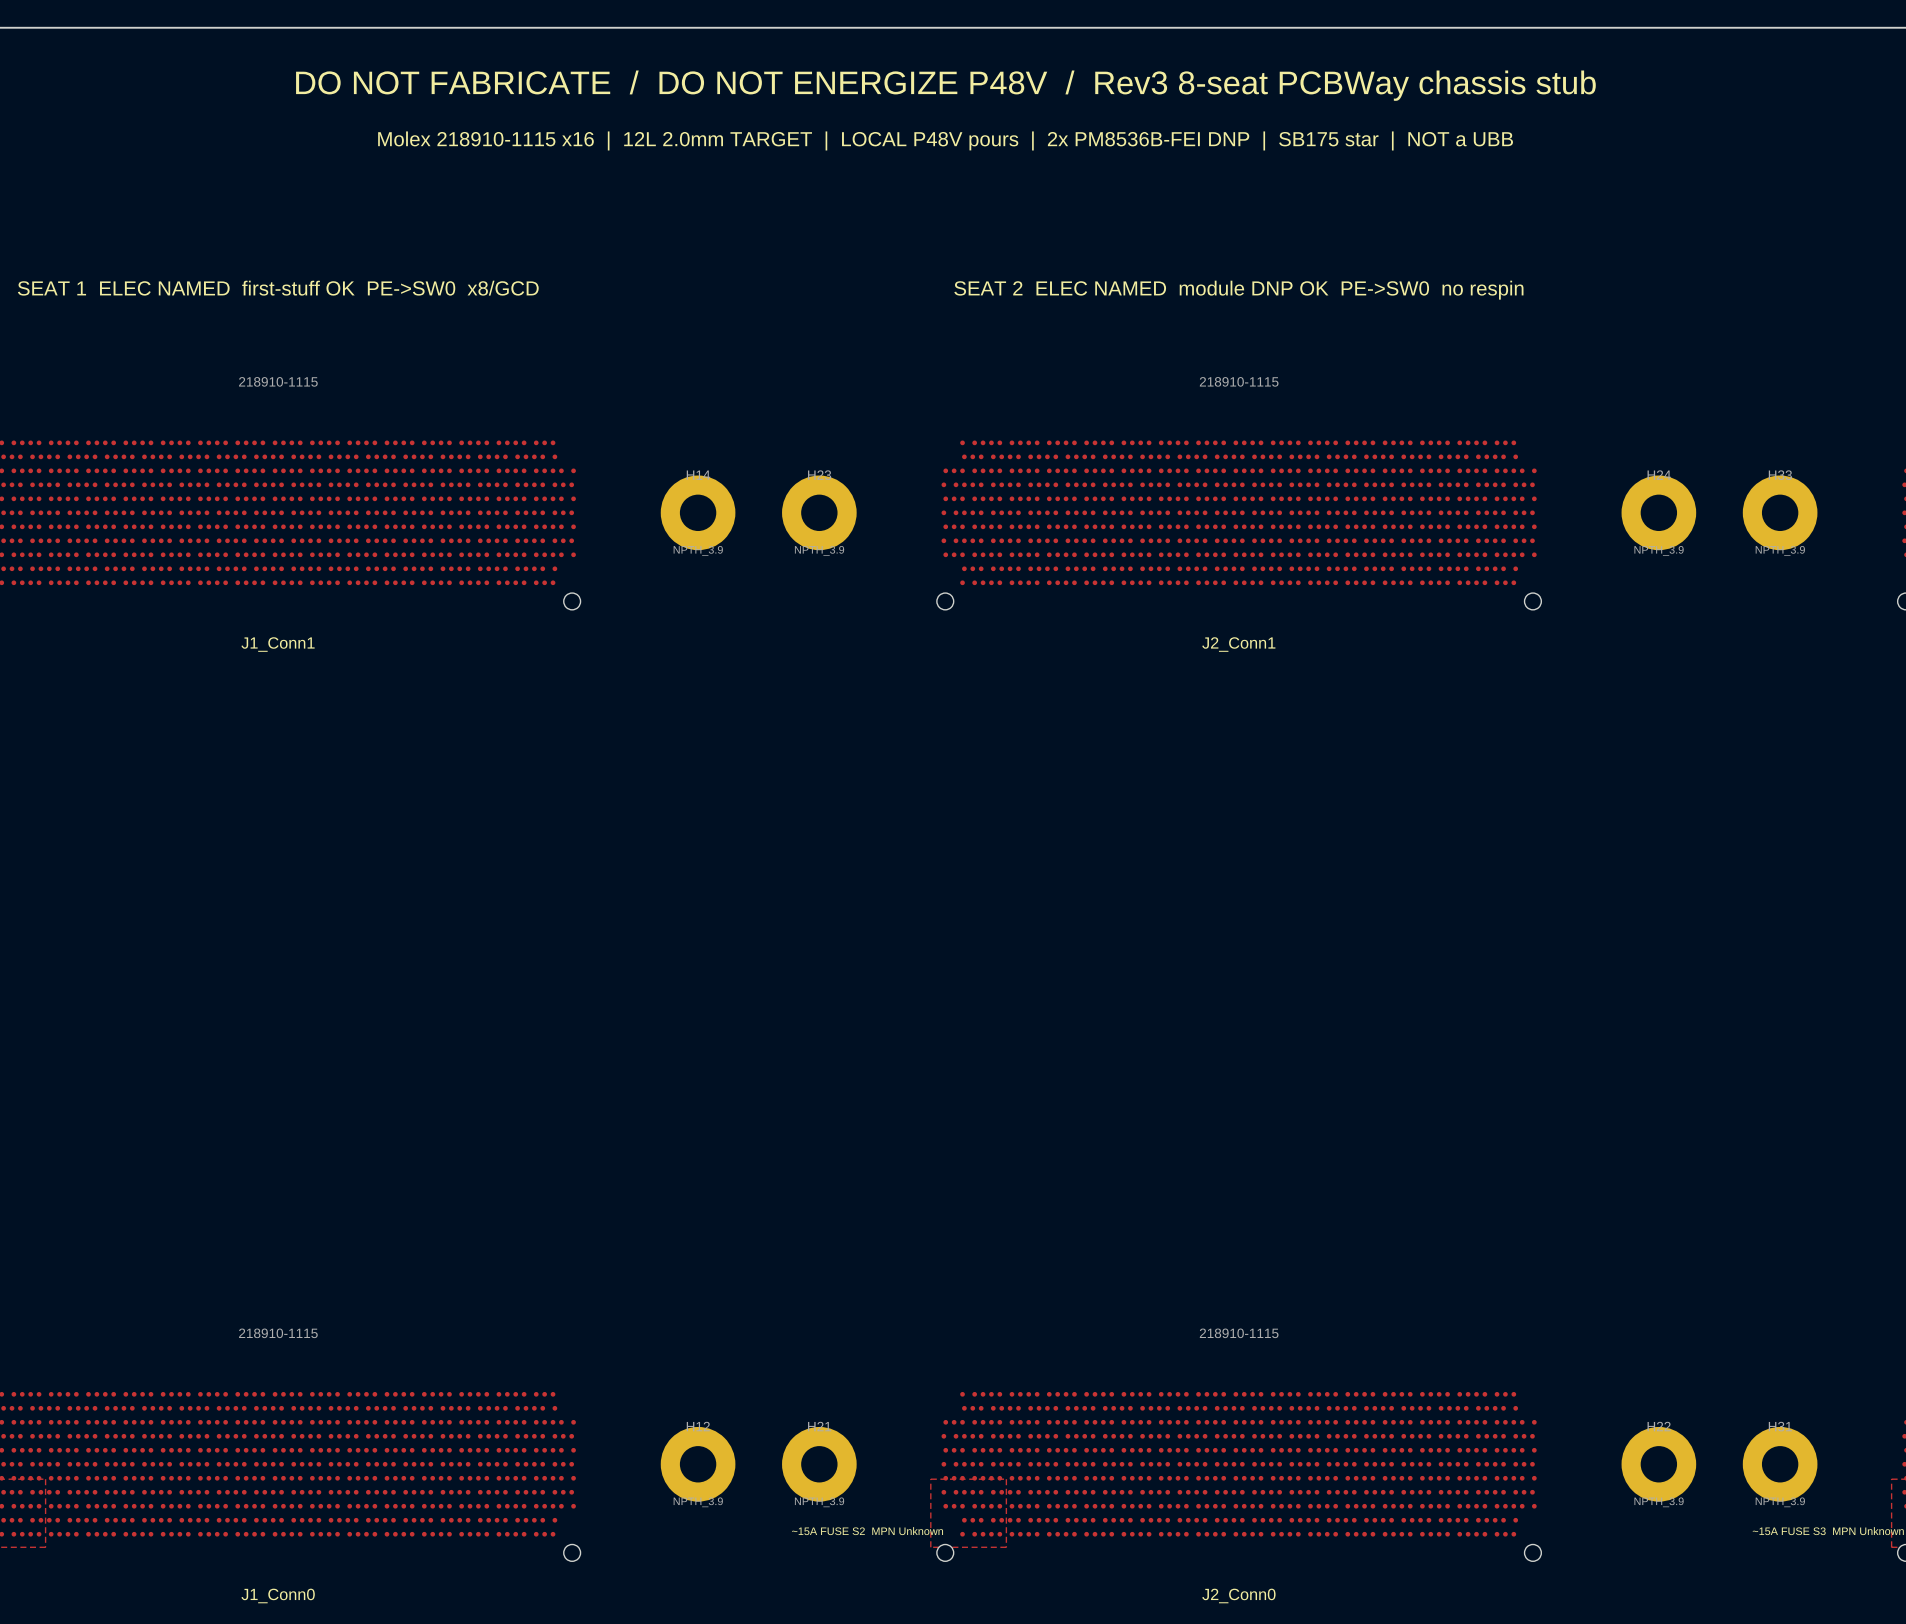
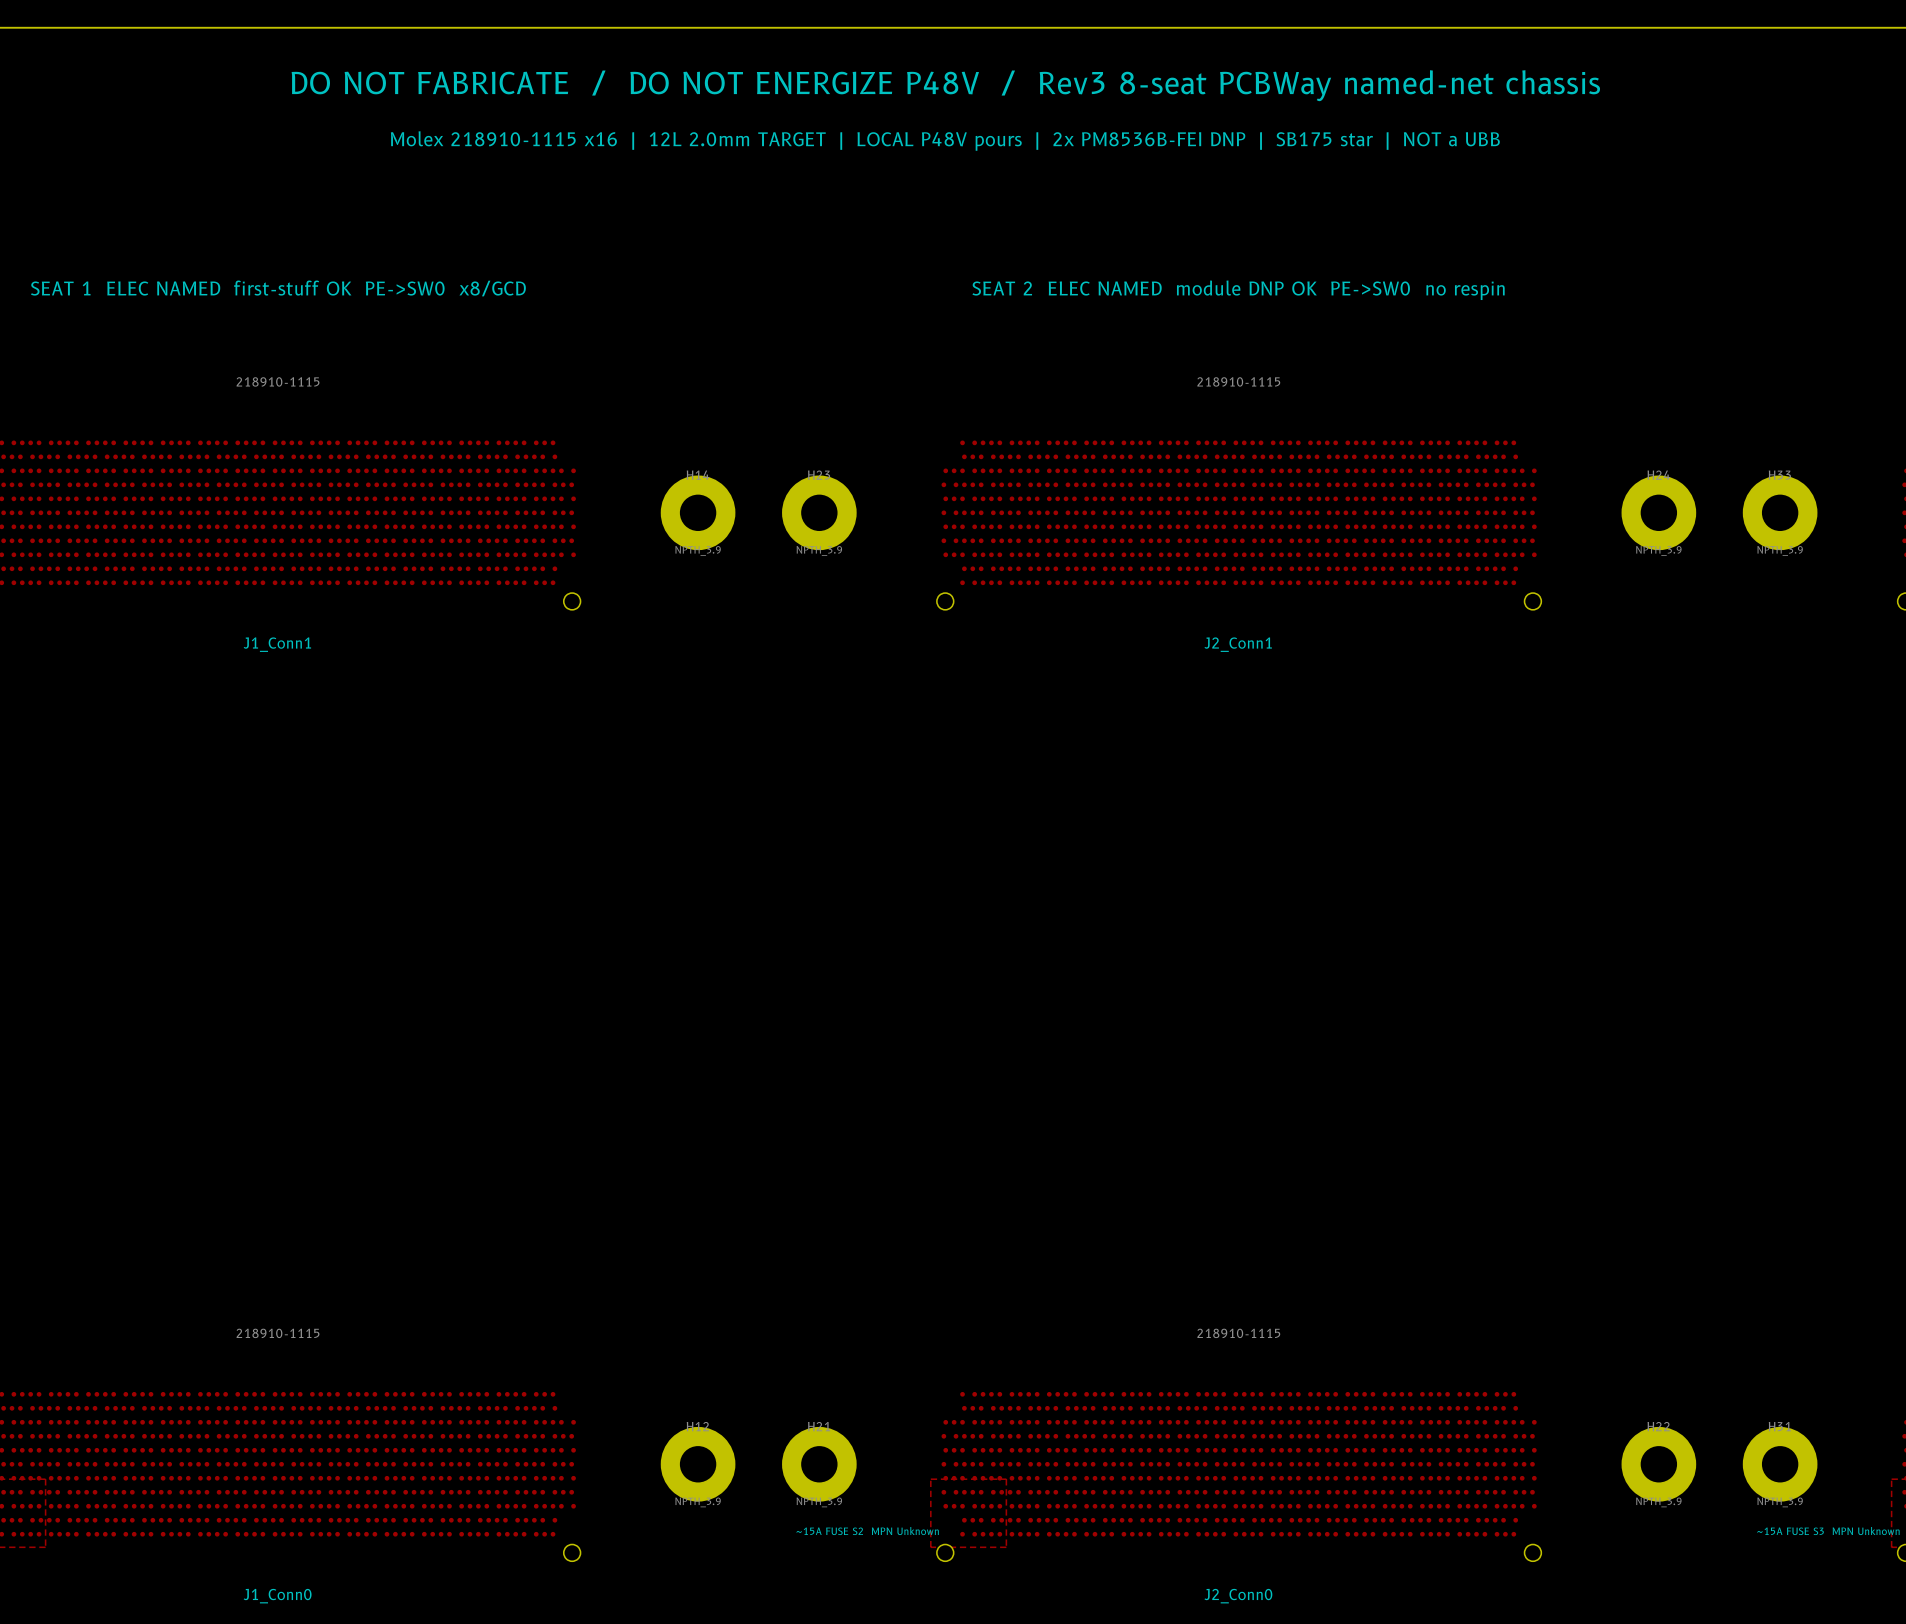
text: DO NOT FABRICATE / DO NOT ENERGIZE P48V / Rev3 8-seat PCBWay chassis stub (945, 85) -> DO NOT FABRICATE / DO NOT ENERGIZE P48V / Rev3 8-seat PCBWay named-net chassis (945, 85)

